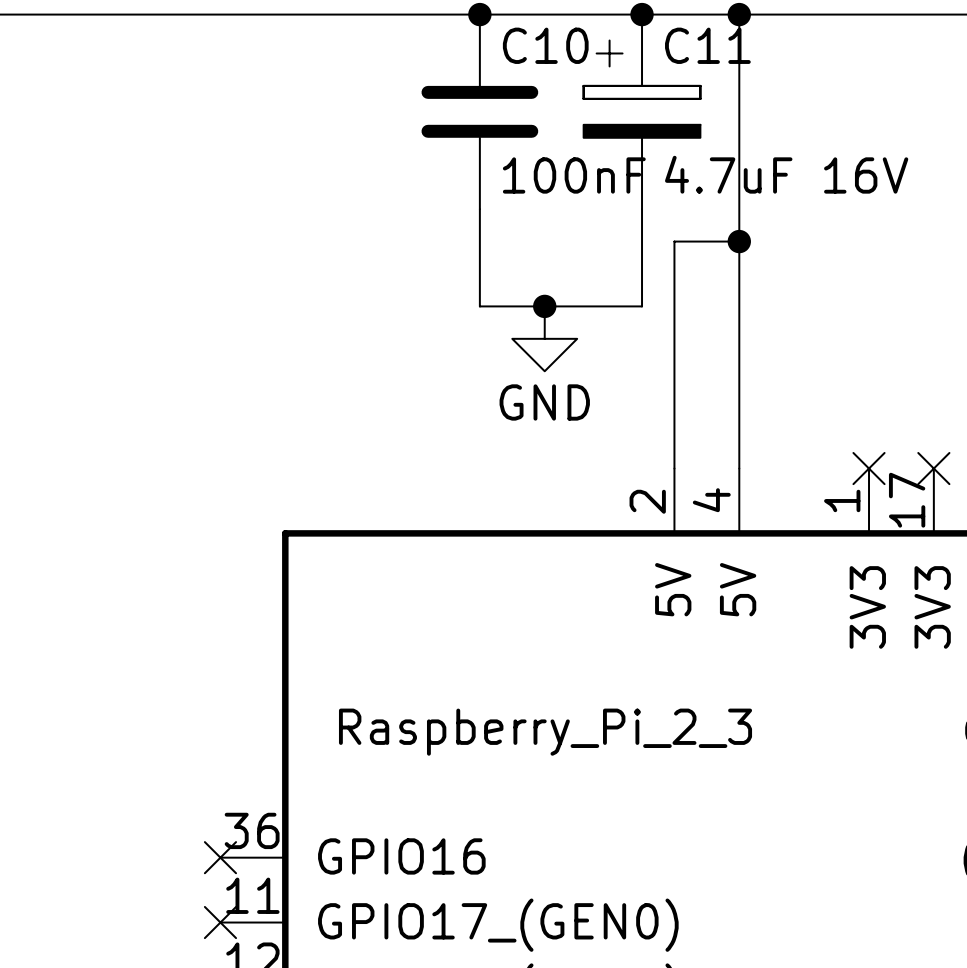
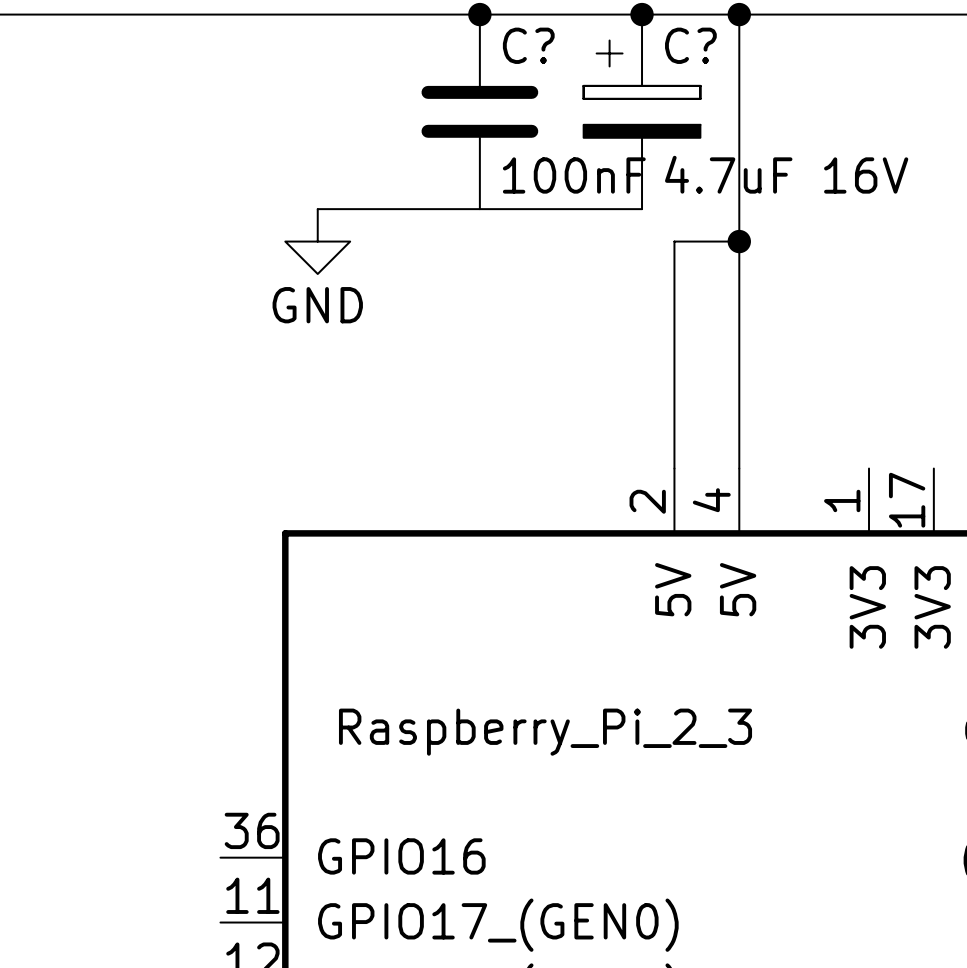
C10 name: C10 (545, 45) -> C? (528, 45)
C11 name: C11 (707, 45) -> C? (690, 45)
wire: (479, 209) (479, 306) (642, 306) (642, 209) -> (317, 209) (642, 209)
junction: (544, 306) -> none
power symbol position: GND (544, 338) -> GND (317, 241)
no-connect mark: (869, 468) -> none
no-connect mark: (933, 468) -> none
no-connect mark: (220, 857) -> none
no-connect mark: (220, 922) -> none

